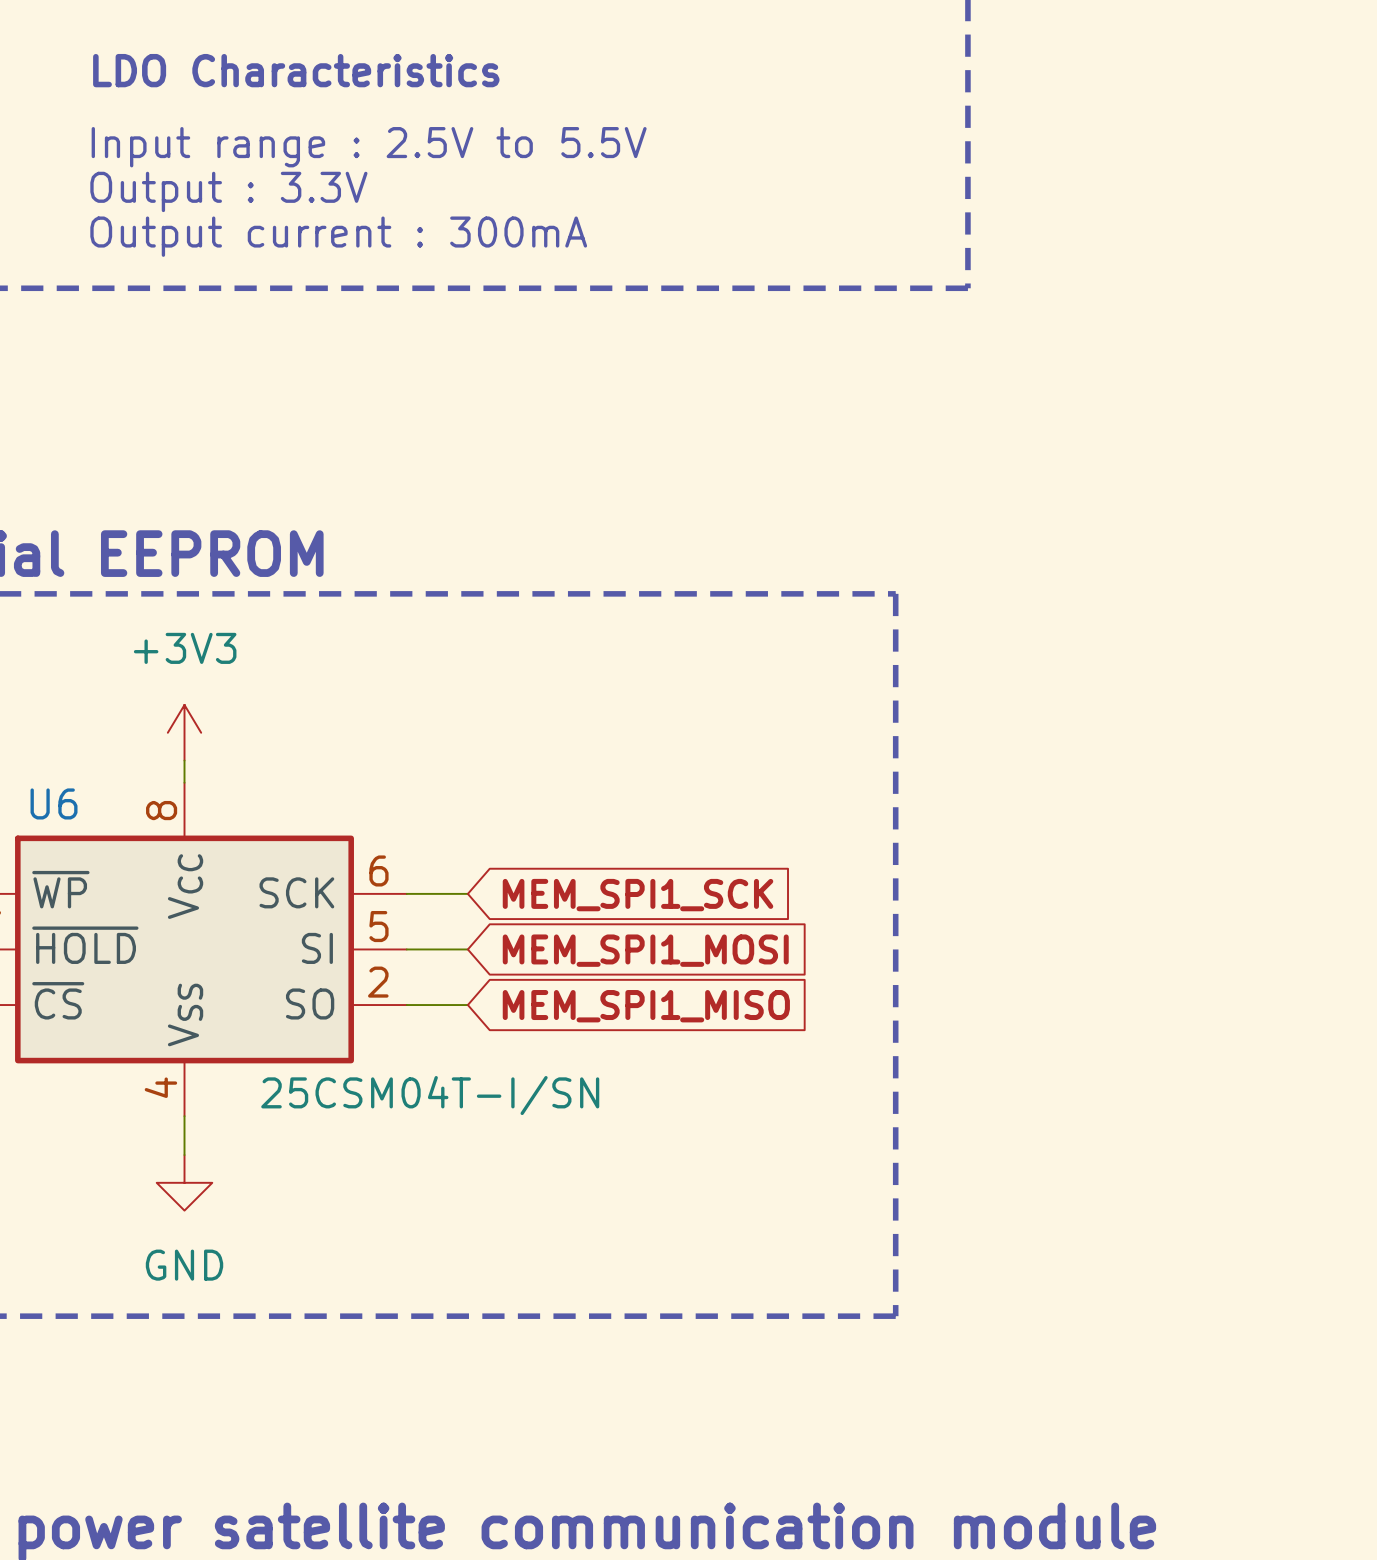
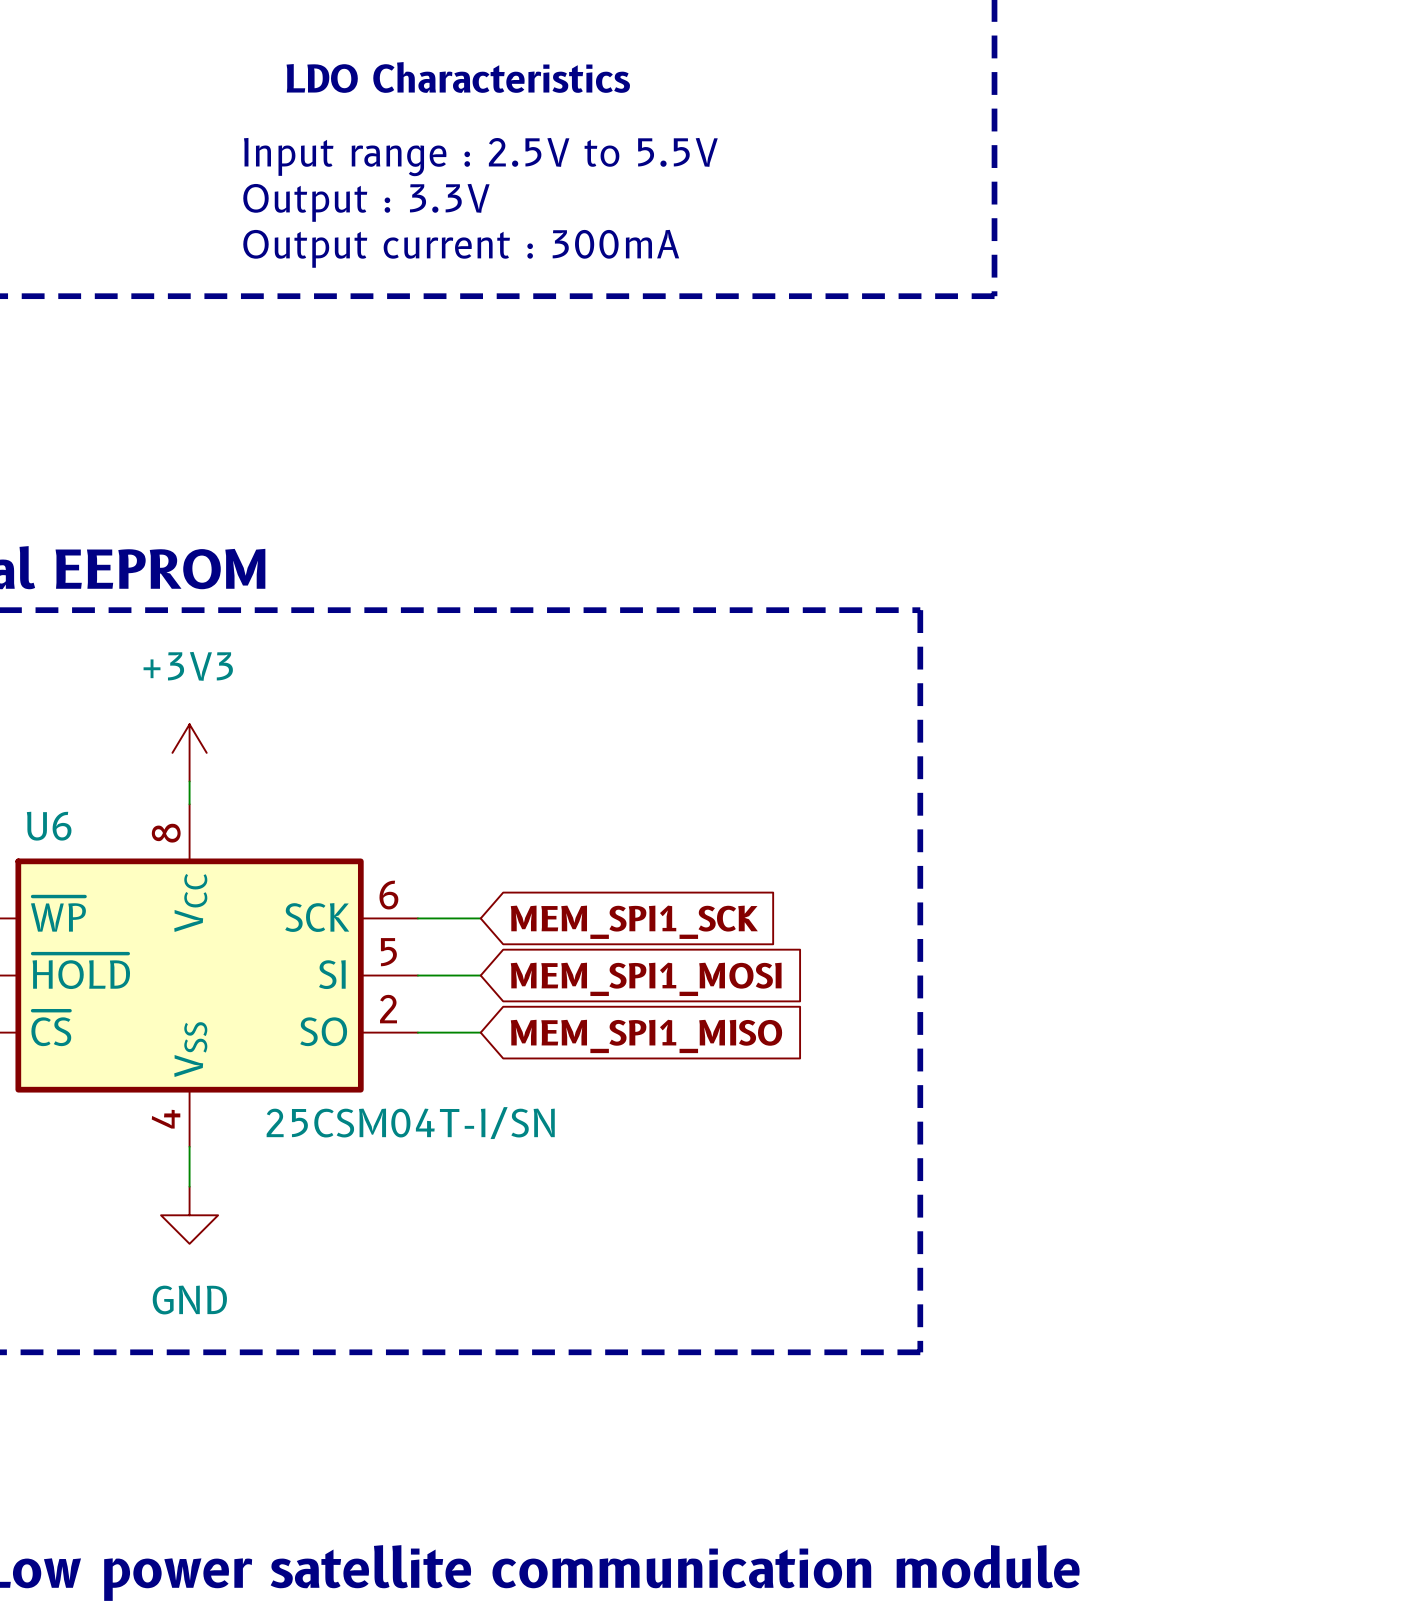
text position: LDO Characteristics (296, 70) -> LDO Characteristics (458, 77)
text position: Input range : 2.5V to 5.5V (369, 147) -> Input range : 2.5V to 5.5V (480, 157)
text position: Output : 3.3V (228, 191) -> Output : 3.3V (366, 202)
text position: Output current : 300mA (338, 236) -> Output current : 300mA (461, 248)

